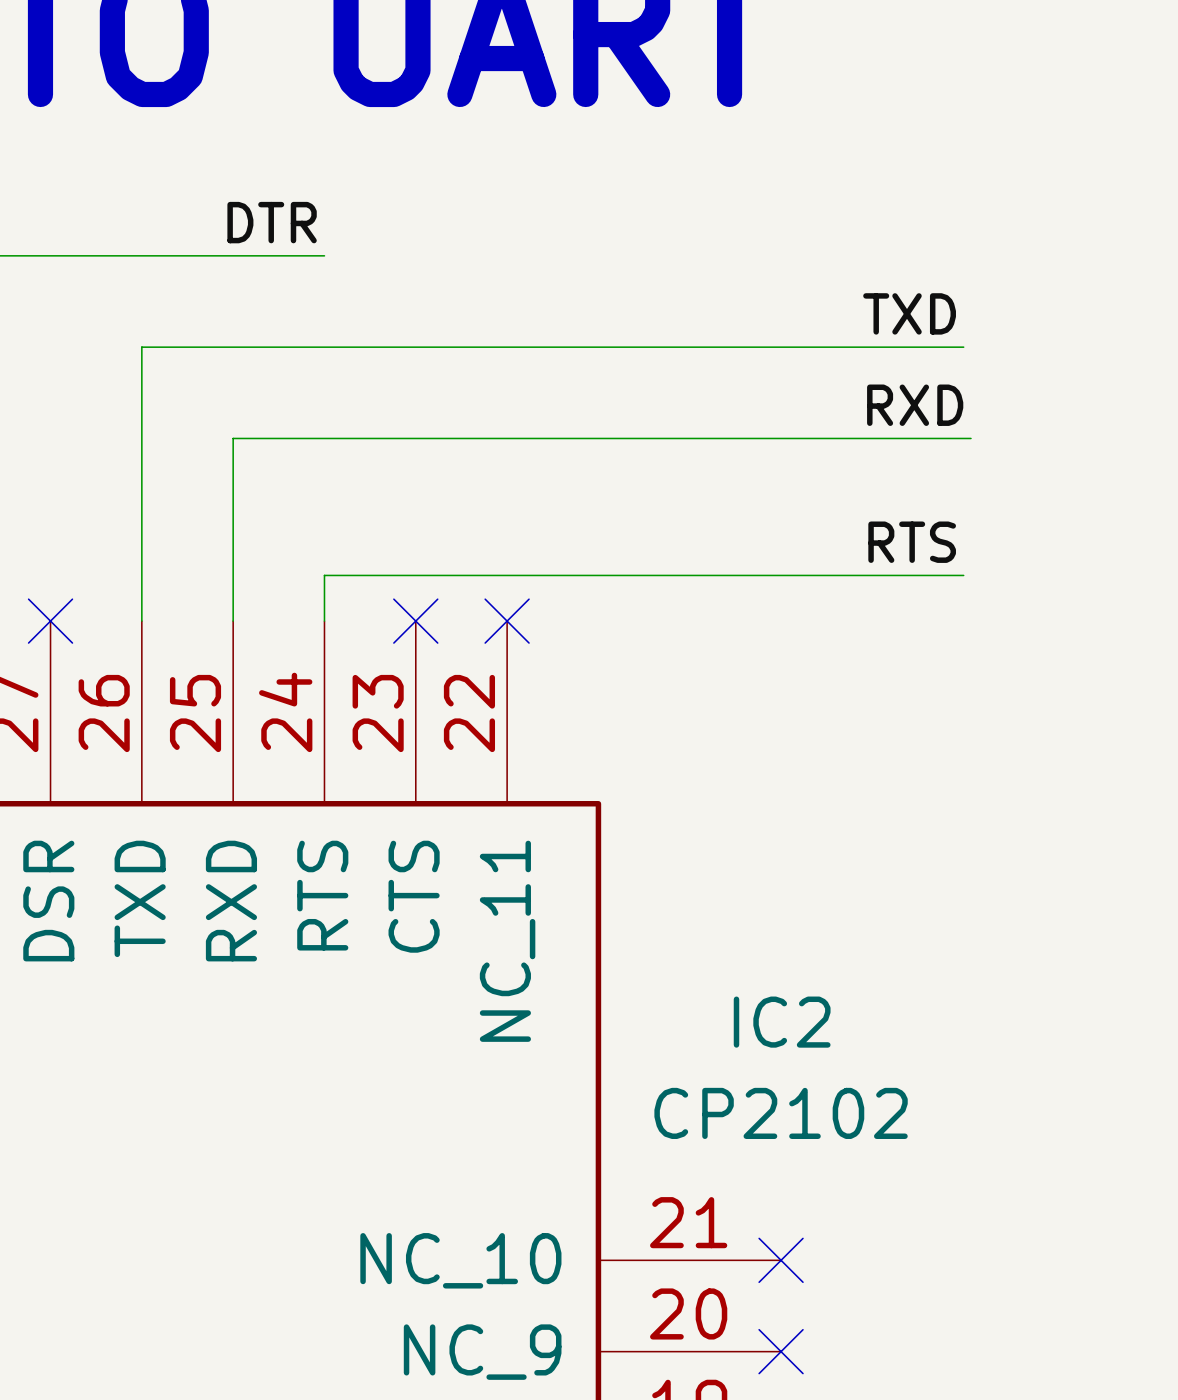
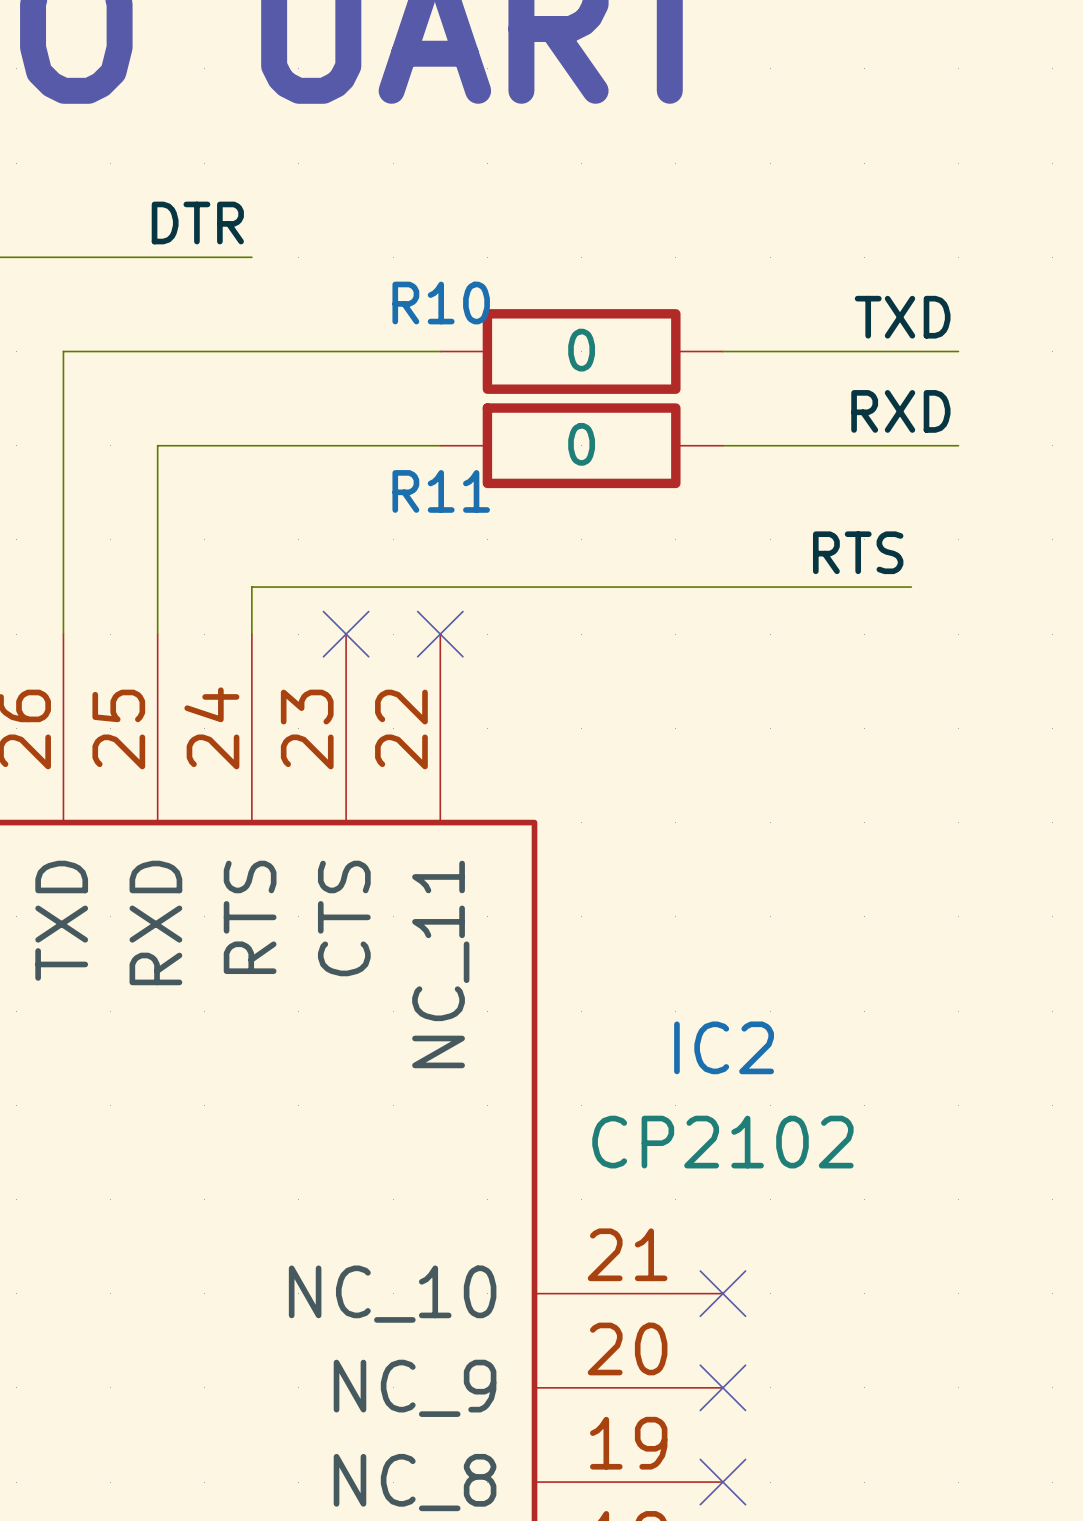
label position: TXD (909, 313) -> TXD (902, 317)
wire: (507, 347) (781, 347) -> none
R10: none -> 0 (581, 351)
wire: none -> (911, 351) (958, 351)
label position: RXD (915, 405) -> RXD (900, 411)
wire: (507, 438) (781, 438) -> none
R11: none -> 0 (581, 445)
wire: none -> (918, 445) (958, 445)

